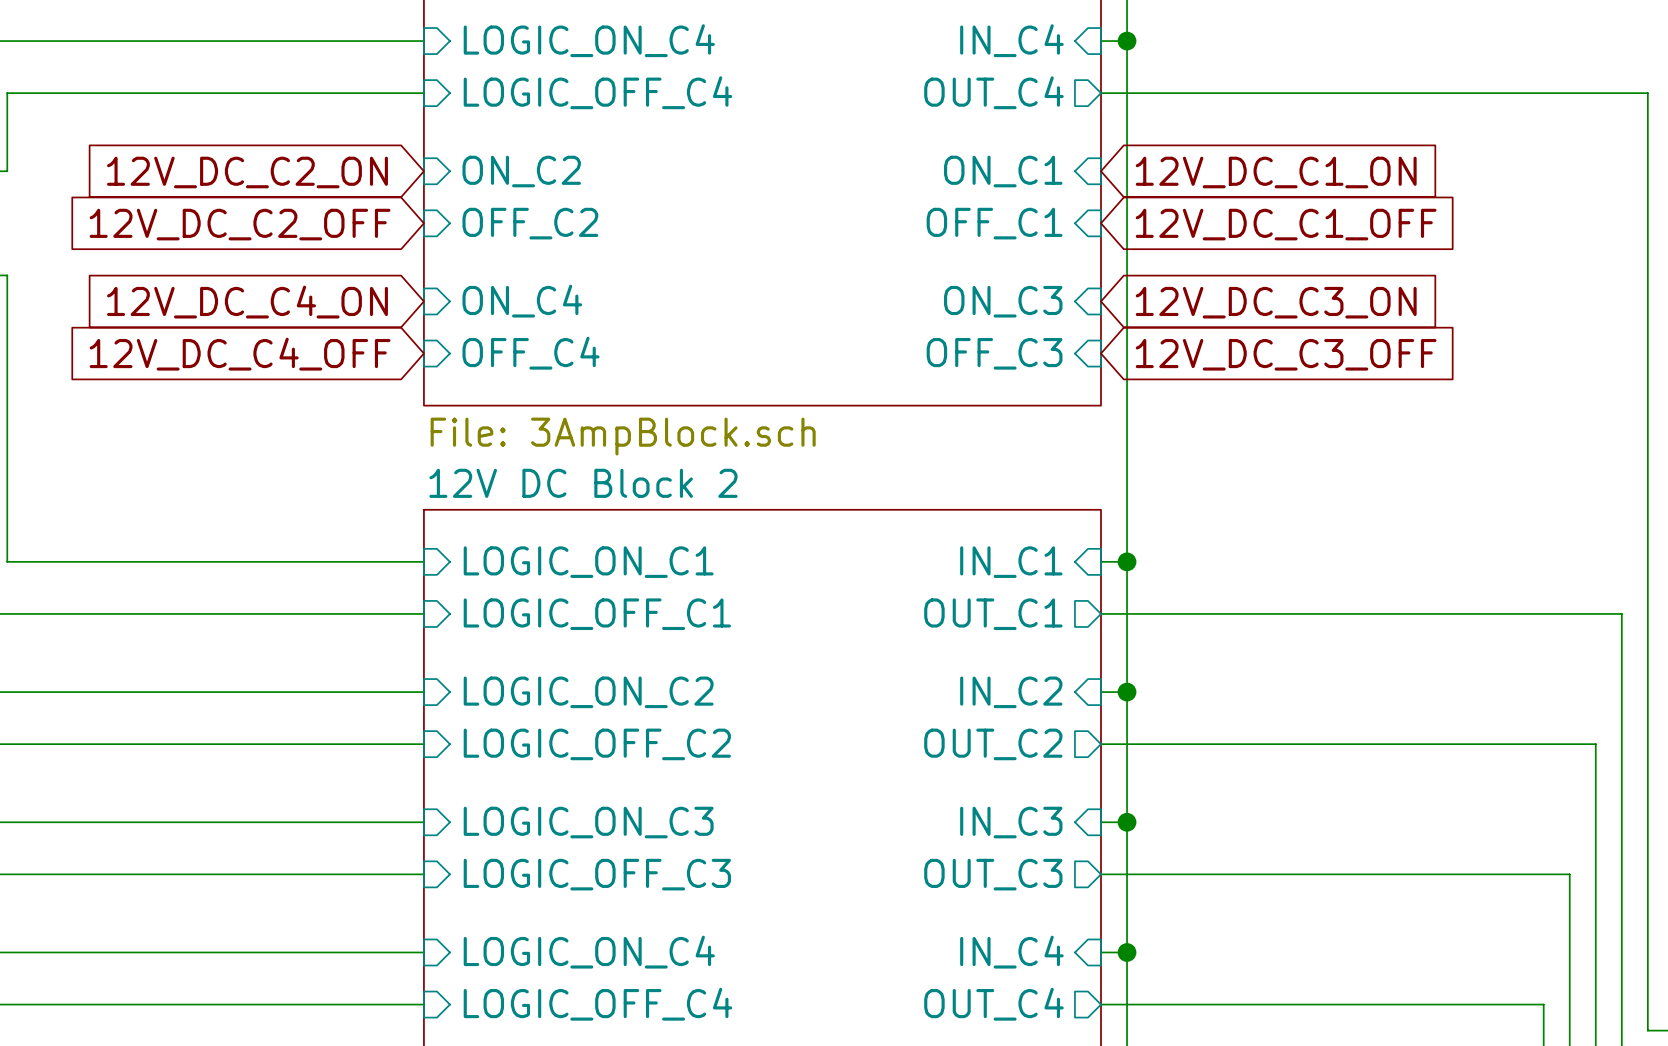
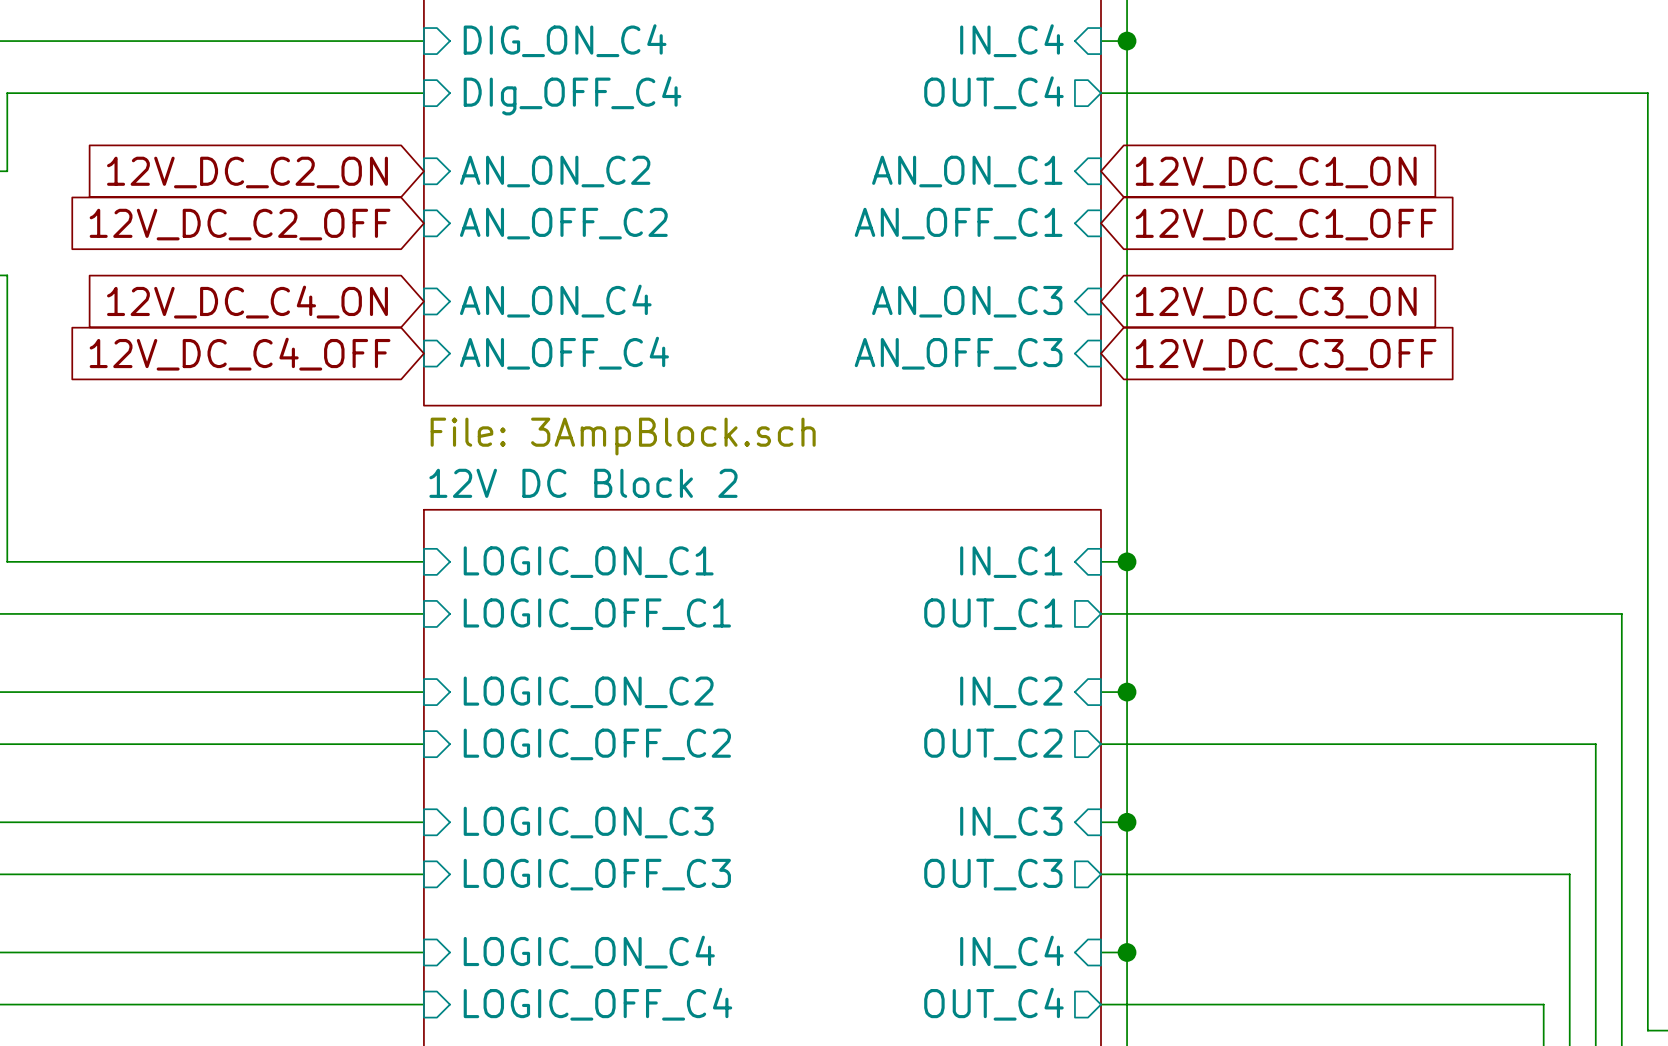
sheet pin: LOGIC_ON_C4 (589, 40) -> DIG_ON_C4 (565, 40)
sheet pin: LOGIC_OFF_C4 (597, 92) -> DIg_OFF_C4 (572, 95)
sheet pin: ON_C2 (521, 171) -> AN_ON_C2 (555, 171)
sheet pin: ON_C1 (1003, 171) -> AN_ON_C1 (967, 171)
sheet pin: OFF_C2 (530, 223) -> AN_OFF_C2 (563, 223)
sheet pin: OFF_C1 (994, 223) -> AN_OFF_C1 (958, 223)
sheet pin: ON_C4 (522, 301) -> AN_ON_C4 (555, 301)
sheet pin: ON_C3 (1003, 301) -> AN_ON_C3 (967, 301)
sheet pin: OFF_C4 (530, 353) -> AN_OFF_C4 (564, 353)
sheet pin: OFF_C3 (994, 353) -> AN_OFF_C3 (958, 353)

